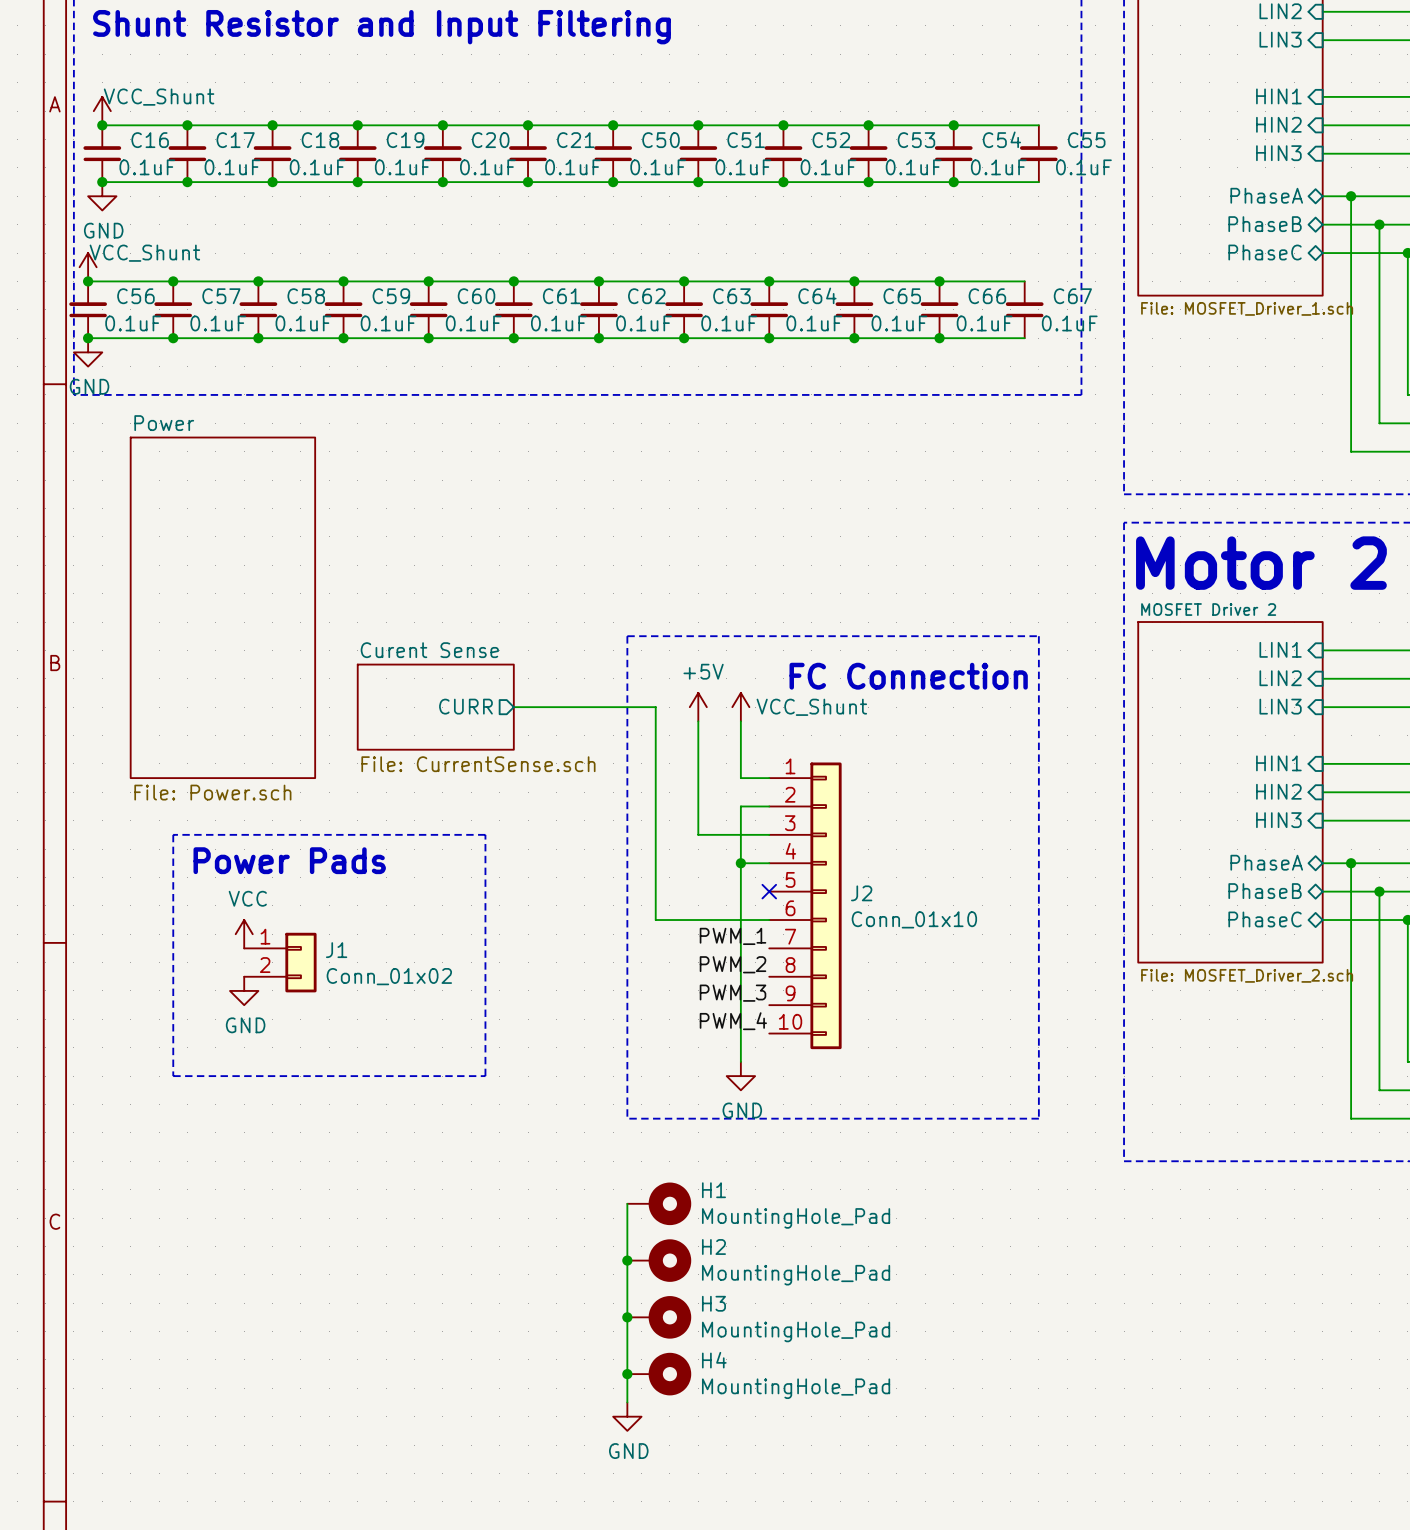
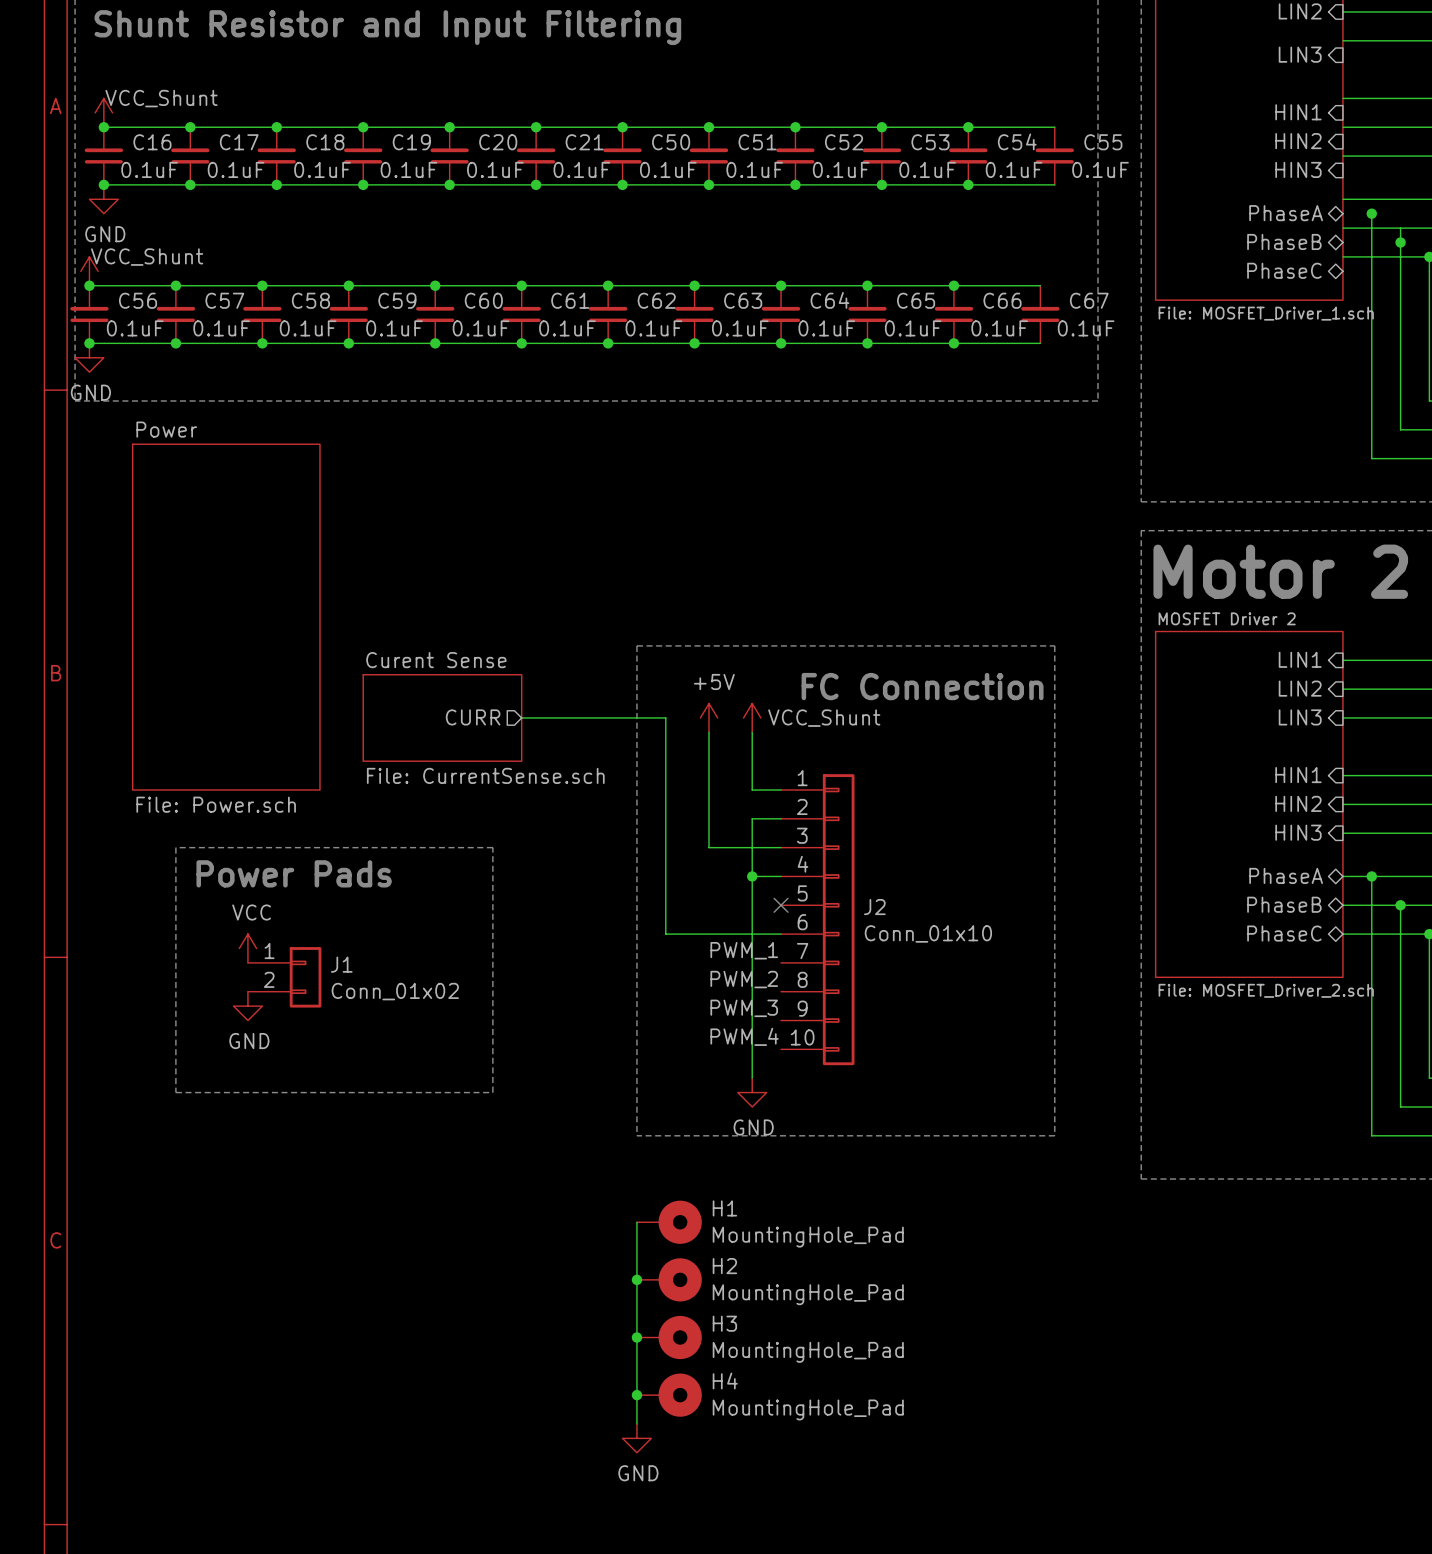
sheet pin position: LIN3 (1280, 39) -> LIN3 (1300, 54)
sheet pin position: HIN1 (1278, 96) -> HIN1 (1298, 112)
sheet pin position: HIN2 (1278, 124) -> HIN2 (1298, 141)
sheet pin position: HIN3 (1278, 153) -> HIN3 (1298, 169)
sheet pin position: PhaseA (1266, 195) -> PhaseA (1286, 213)
wire: (1351, 196) (1351, 210) -> none
junction position: (1351, 196) -> (1371, 213)
sheet pin position: PhaseB (1265, 224) -> PhaseB (1284, 241)
junction position: (1379, 224) -> (1400, 242)
sheet pin position: PhaseC (1265, 252) -> PhaseC (1284, 270)

